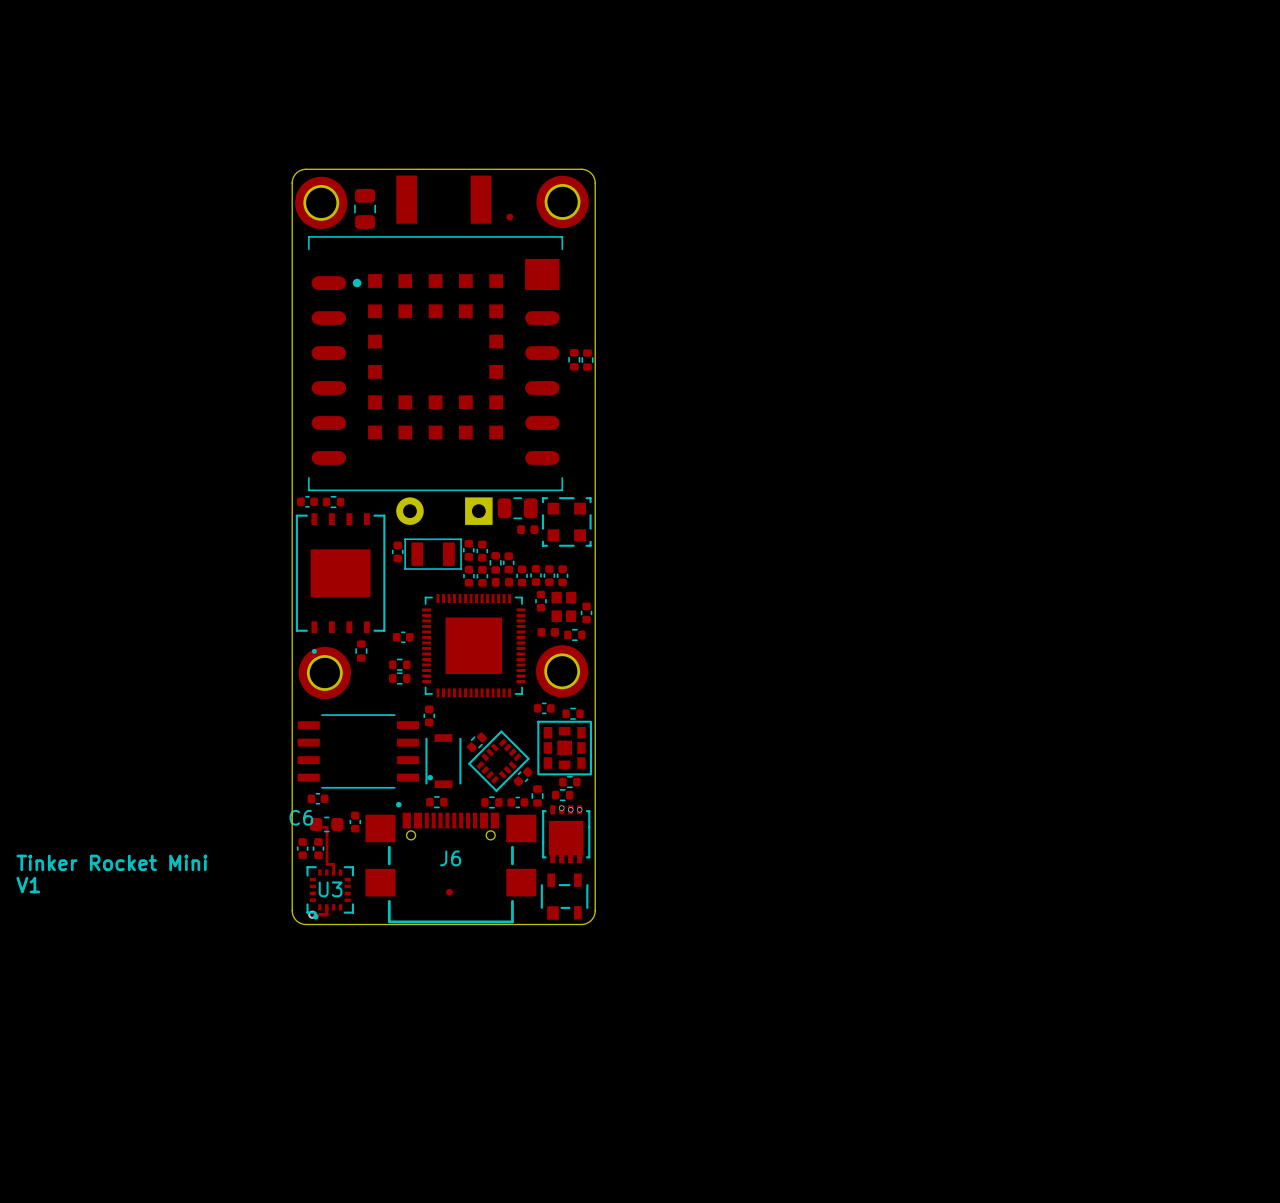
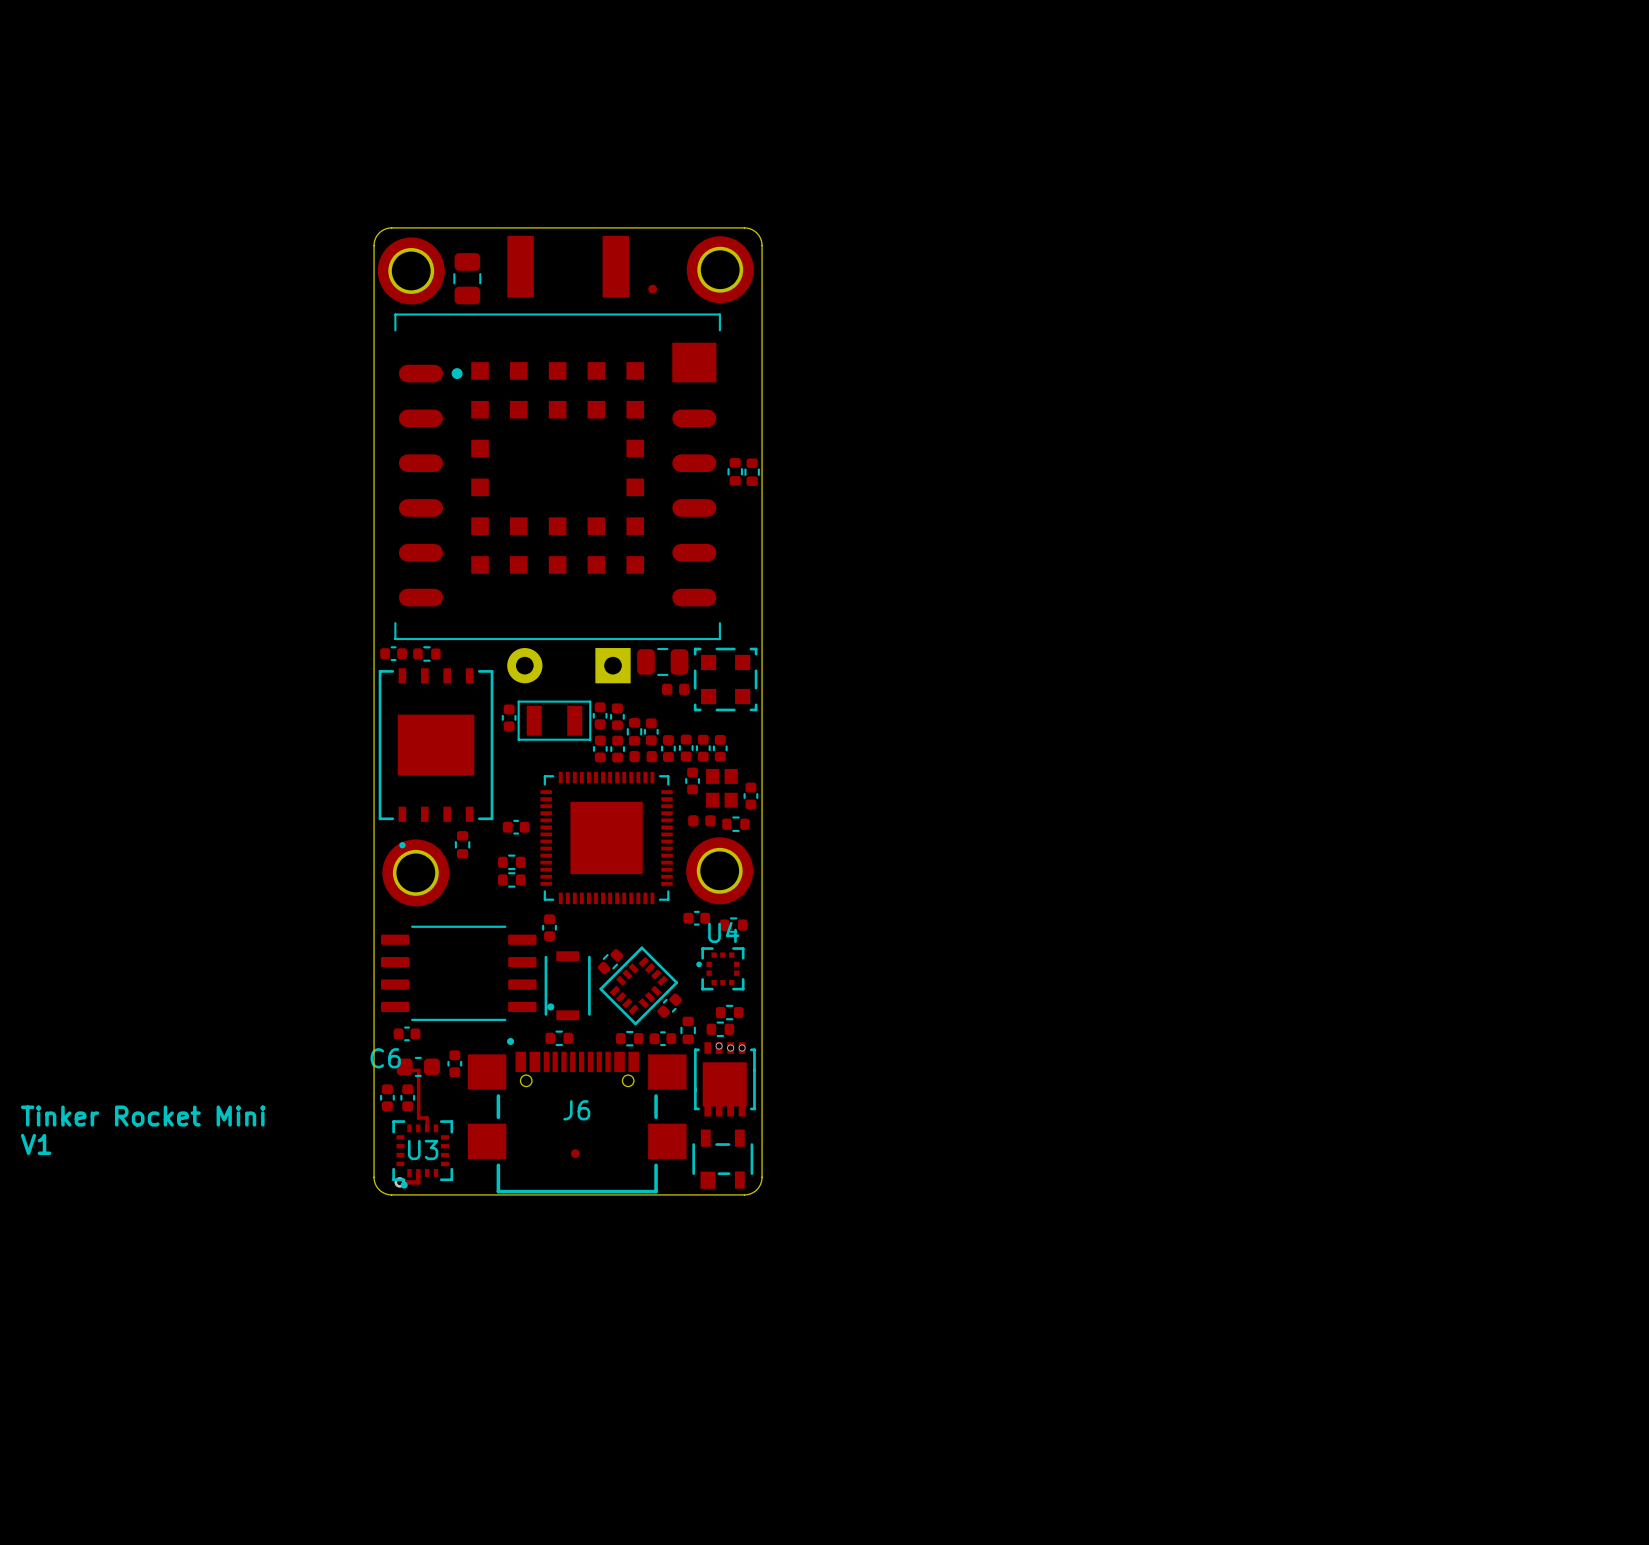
U4: none -> (720, 968)
part: (564, 748) -> none

